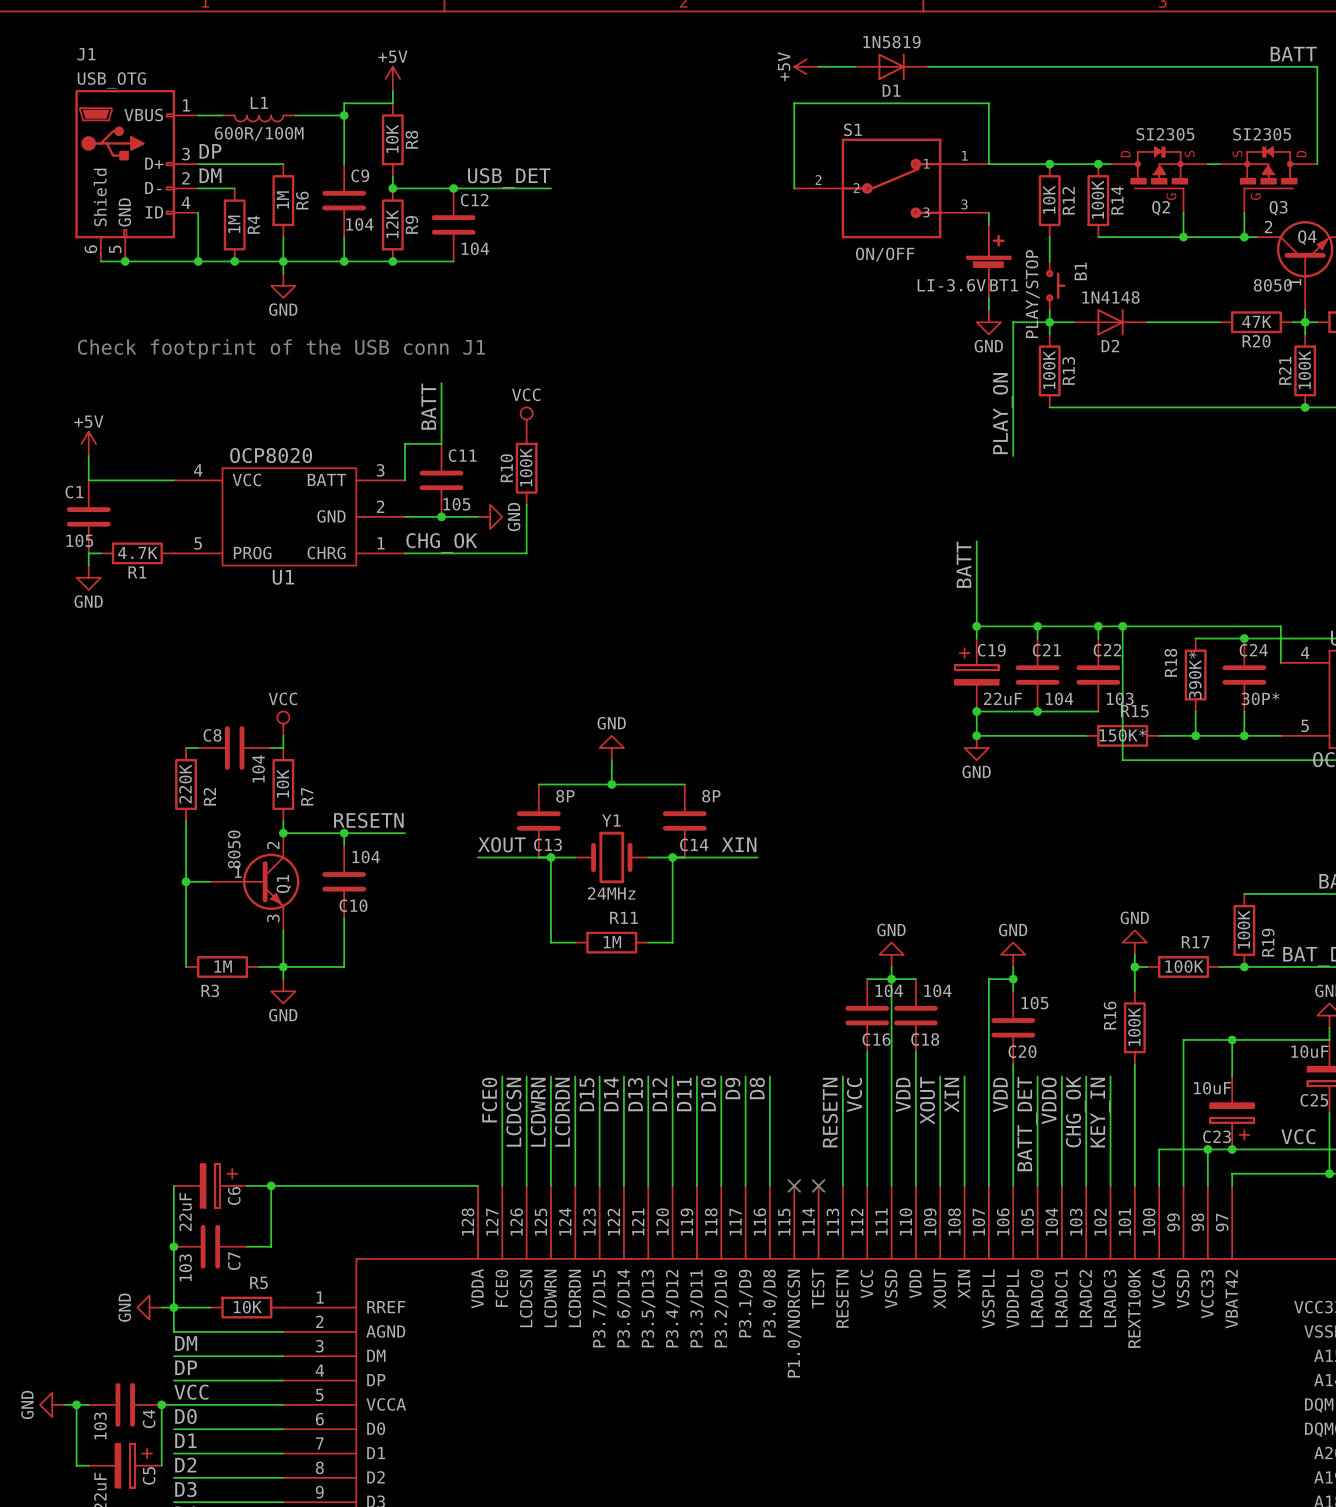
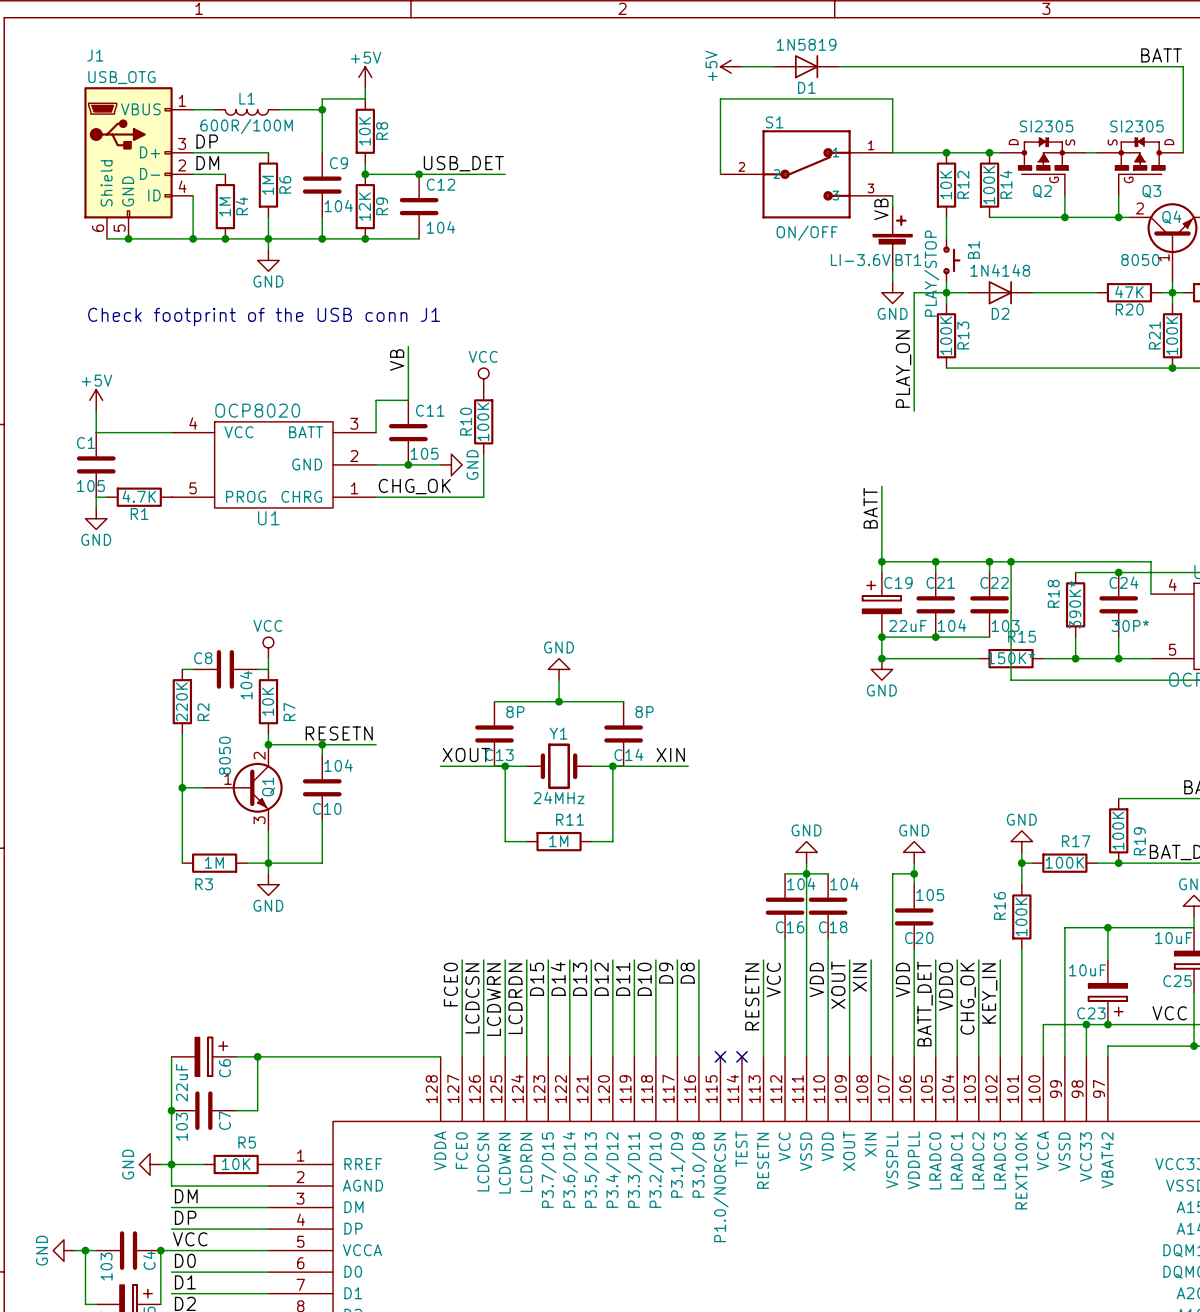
label: none -> VB (881, 209)
label: BATT (428, 406) -> VB (397, 359)

